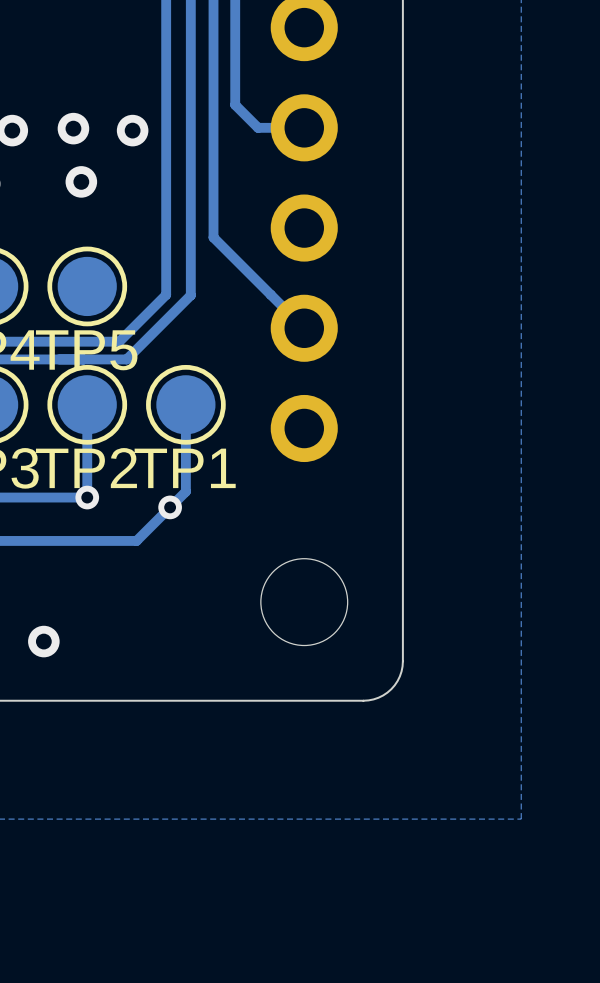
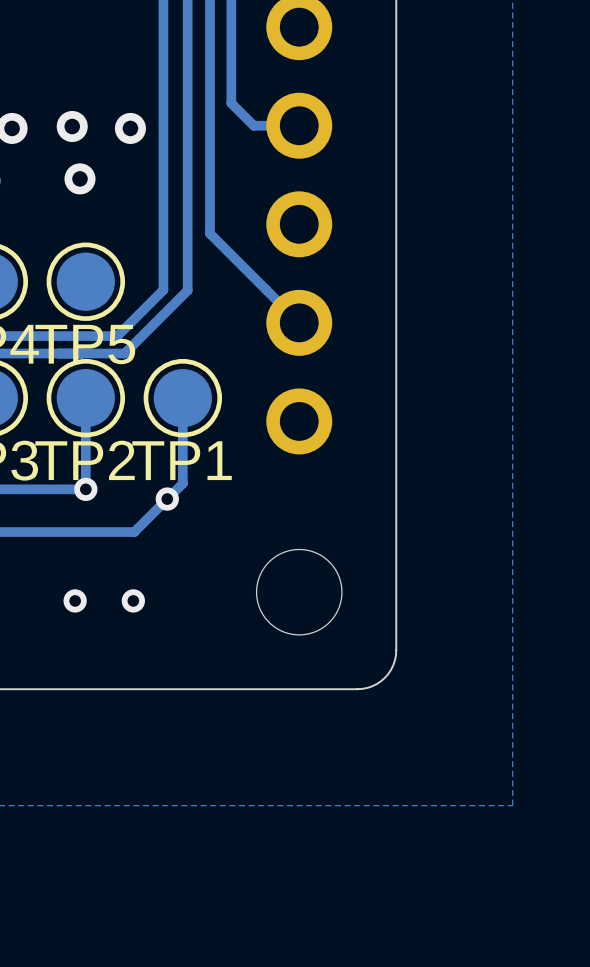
via: none -> (75, 600)
via: none -> (133, 600)
via: (43, 641) -> none

